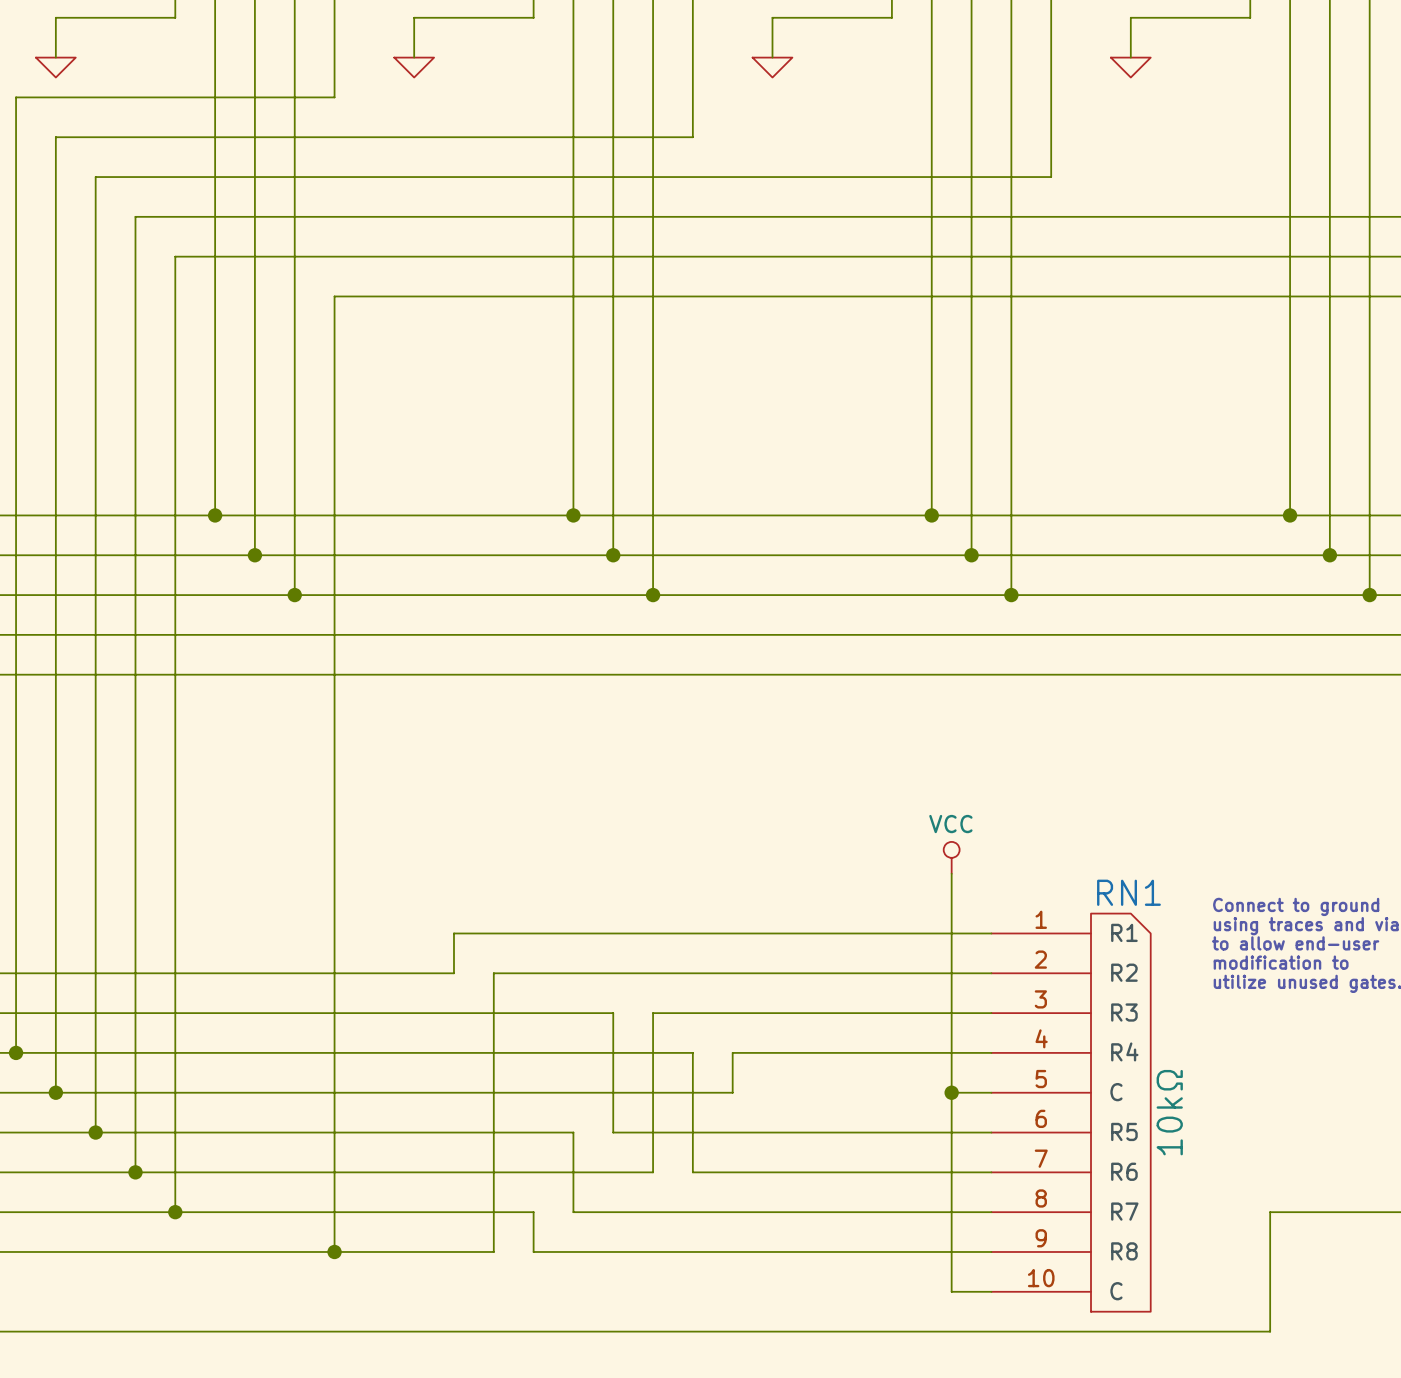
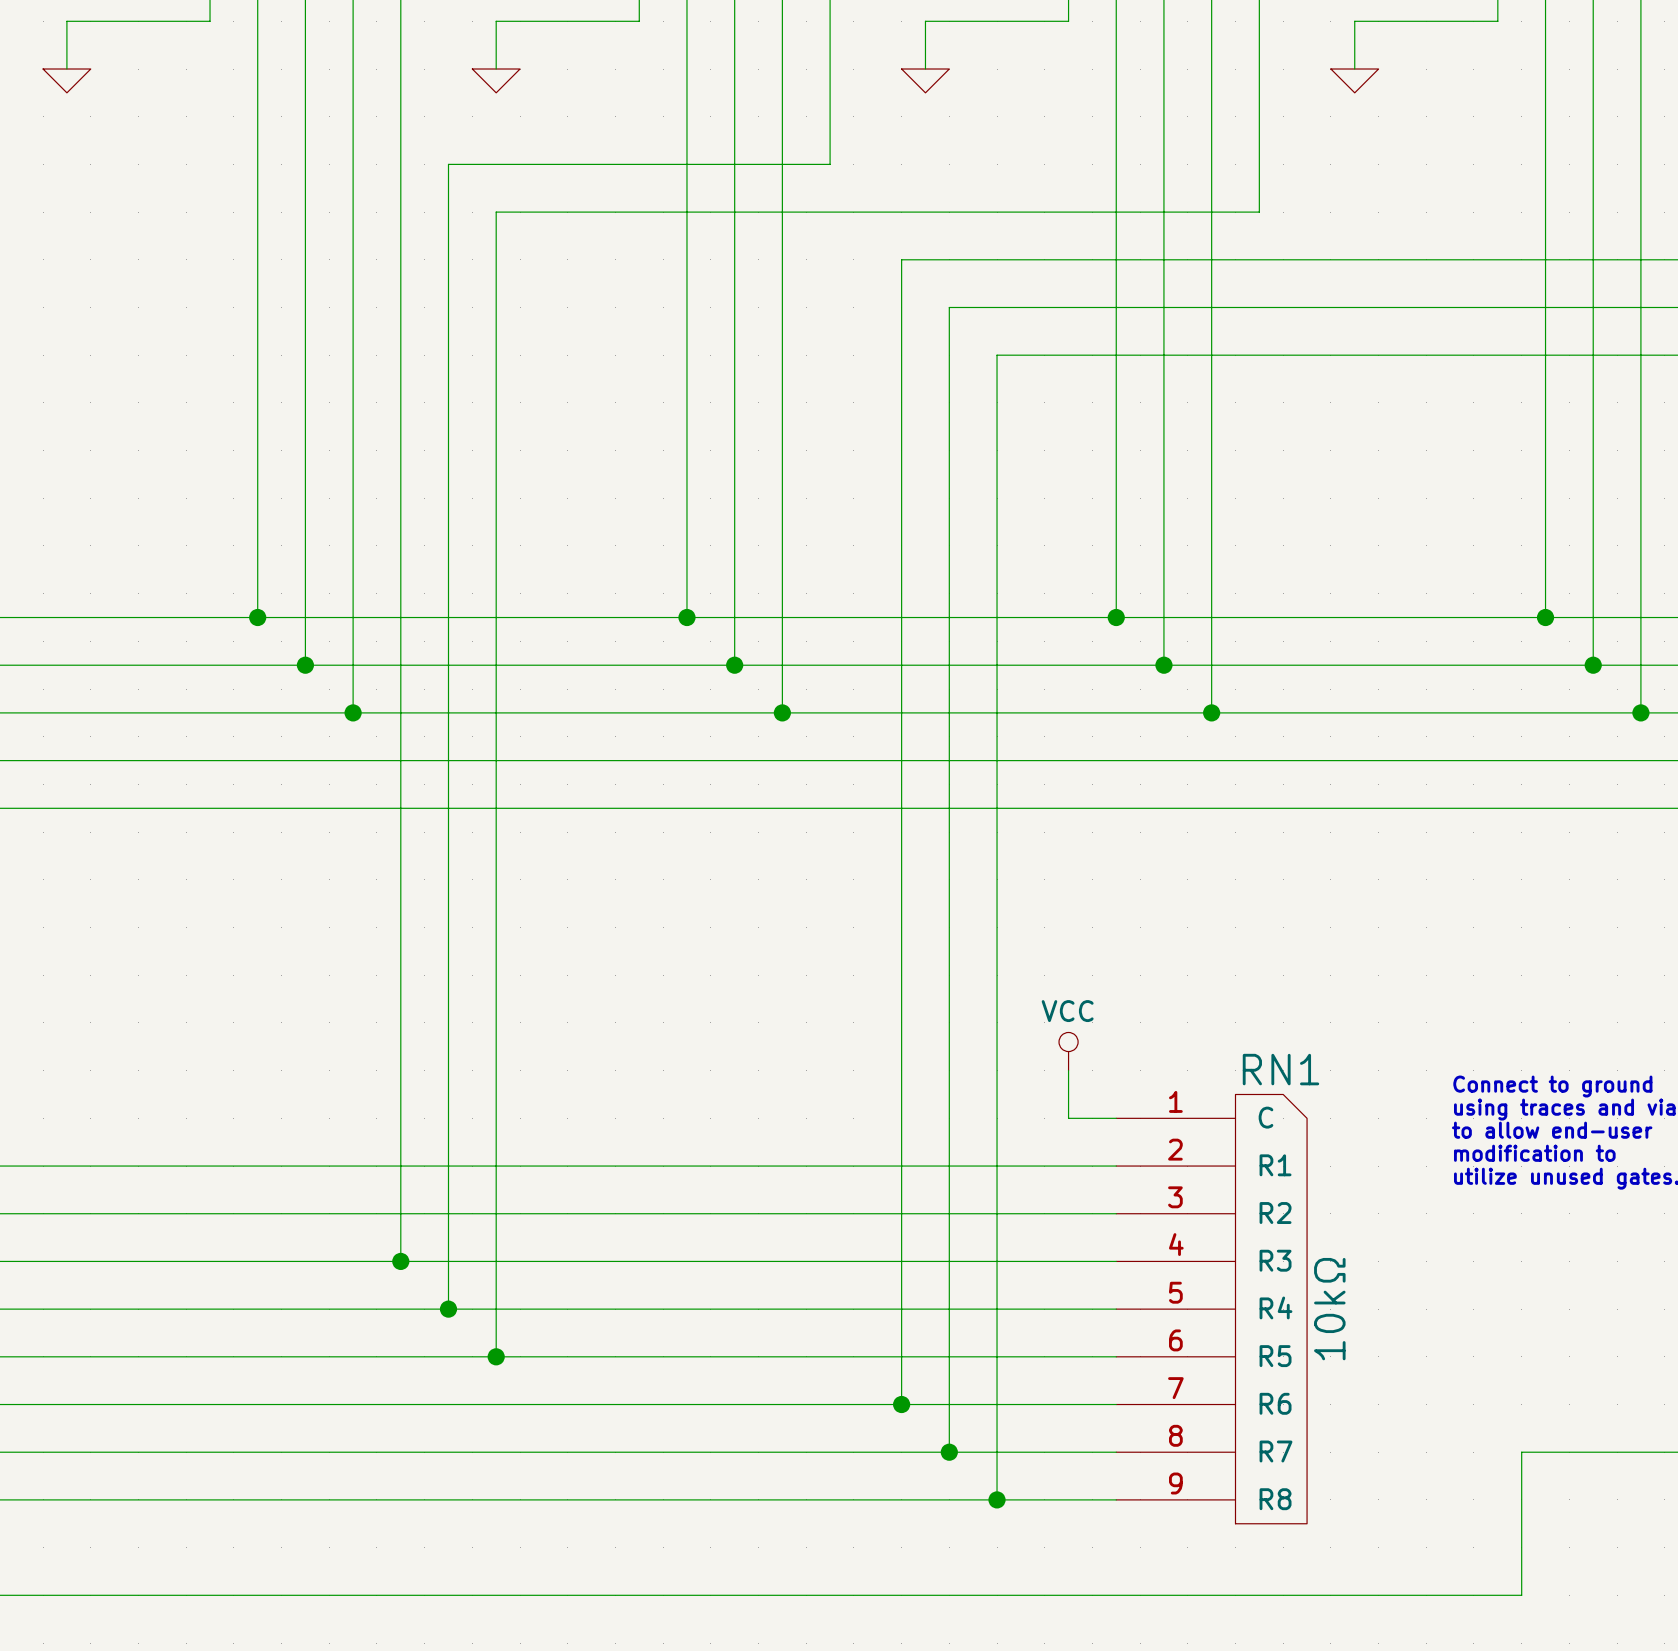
wire: (334, 97) (16, 97) (16, 1052) -> none
wire: (374, 137) (55, 137) (55, 1092) -> (448, 164) (448, 1309)
wire: (414, 177) (95, 177) (95, 1132) -> (496, 212) (496, 1356)
wire: (752, 216) (135, 216) (135, 1172) -> (901, 259) (901, 1404)
wire: (792, 256) (175, 256) (175, 1212) -> (949, 307) (949, 1452)
wire: (334, 296) (832, 296) -> (400, 355) (400, 116)
wire: none -> (997, 355) (997, 1499)
power symbol position: VCC (951, 857) -> VCC (1068, 1051)
wire: (951, 873) (951, 1291) (991, 1291) -> none
wire: none -> (1068, 1070) (1068, 1118)
RN1 symbol: [991, 913, 1151, 1312] -> [1116, 1094, 1308, 1524]
wire: (891, 933) (453, 933) (453, 973) -> (591, 1166) (543, 1166)
wire: (493, 973) (493, 1251) -> (639, 1499) (591, 1499)
wire: (613, 1013) (613, 1132) -> (734, 1213) (782, 1213)
wire: (653, 1013) (653, 1172) -> none
junction: (16, 1052) -> none
wire: (334, 1052) (334, 1251) -> none
junction: none -> (400, 1261)
wire: (692, 1052) (692, 1172) -> (782, 1404) (830, 1404)
wire: (732, 1052) (732, 1092) -> (877, 1261) (830, 1261)
junction: (55, 1092) -> none
junction: none -> (448, 1309)
wire: none -> (877, 1309) (1116, 1309)
junction: (951, 1092) -> none
junction: (95, 1132) -> none
junction: none -> (496, 1356)
wire: (573, 1132) (573, 1212) -> (686, 1356) (734, 1356)
junction: (135, 1172) -> none
junction: none -> (901, 1404)
junction: (175, 1212) -> none
wire: (533, 1212) (533, 1251) -> (639, 1452) (686, 1452)
junction: none -> (949, 1452)
junction: (334, 1251) -> none
junction: none -> (997, 1499)

